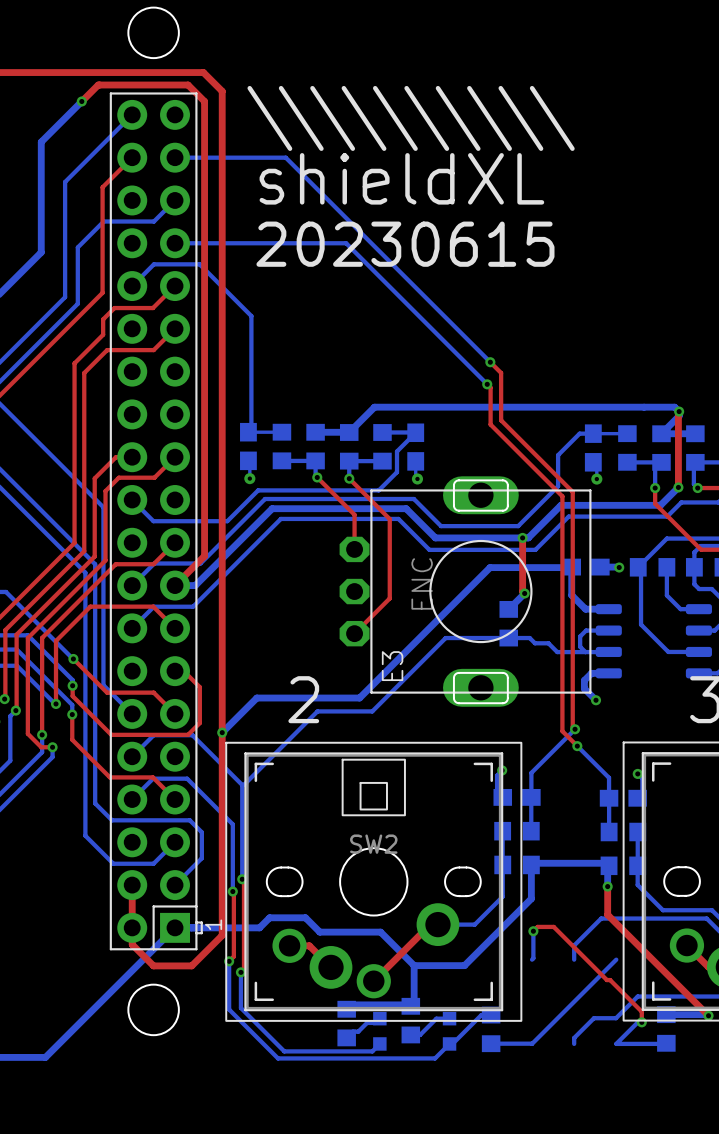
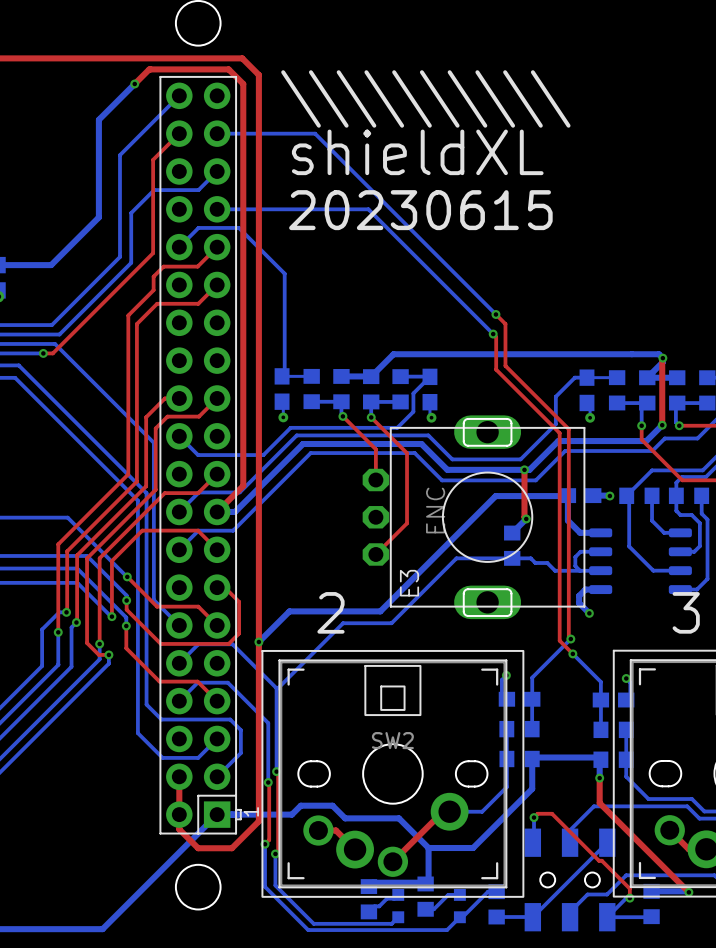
part: none -> (570, 879)

